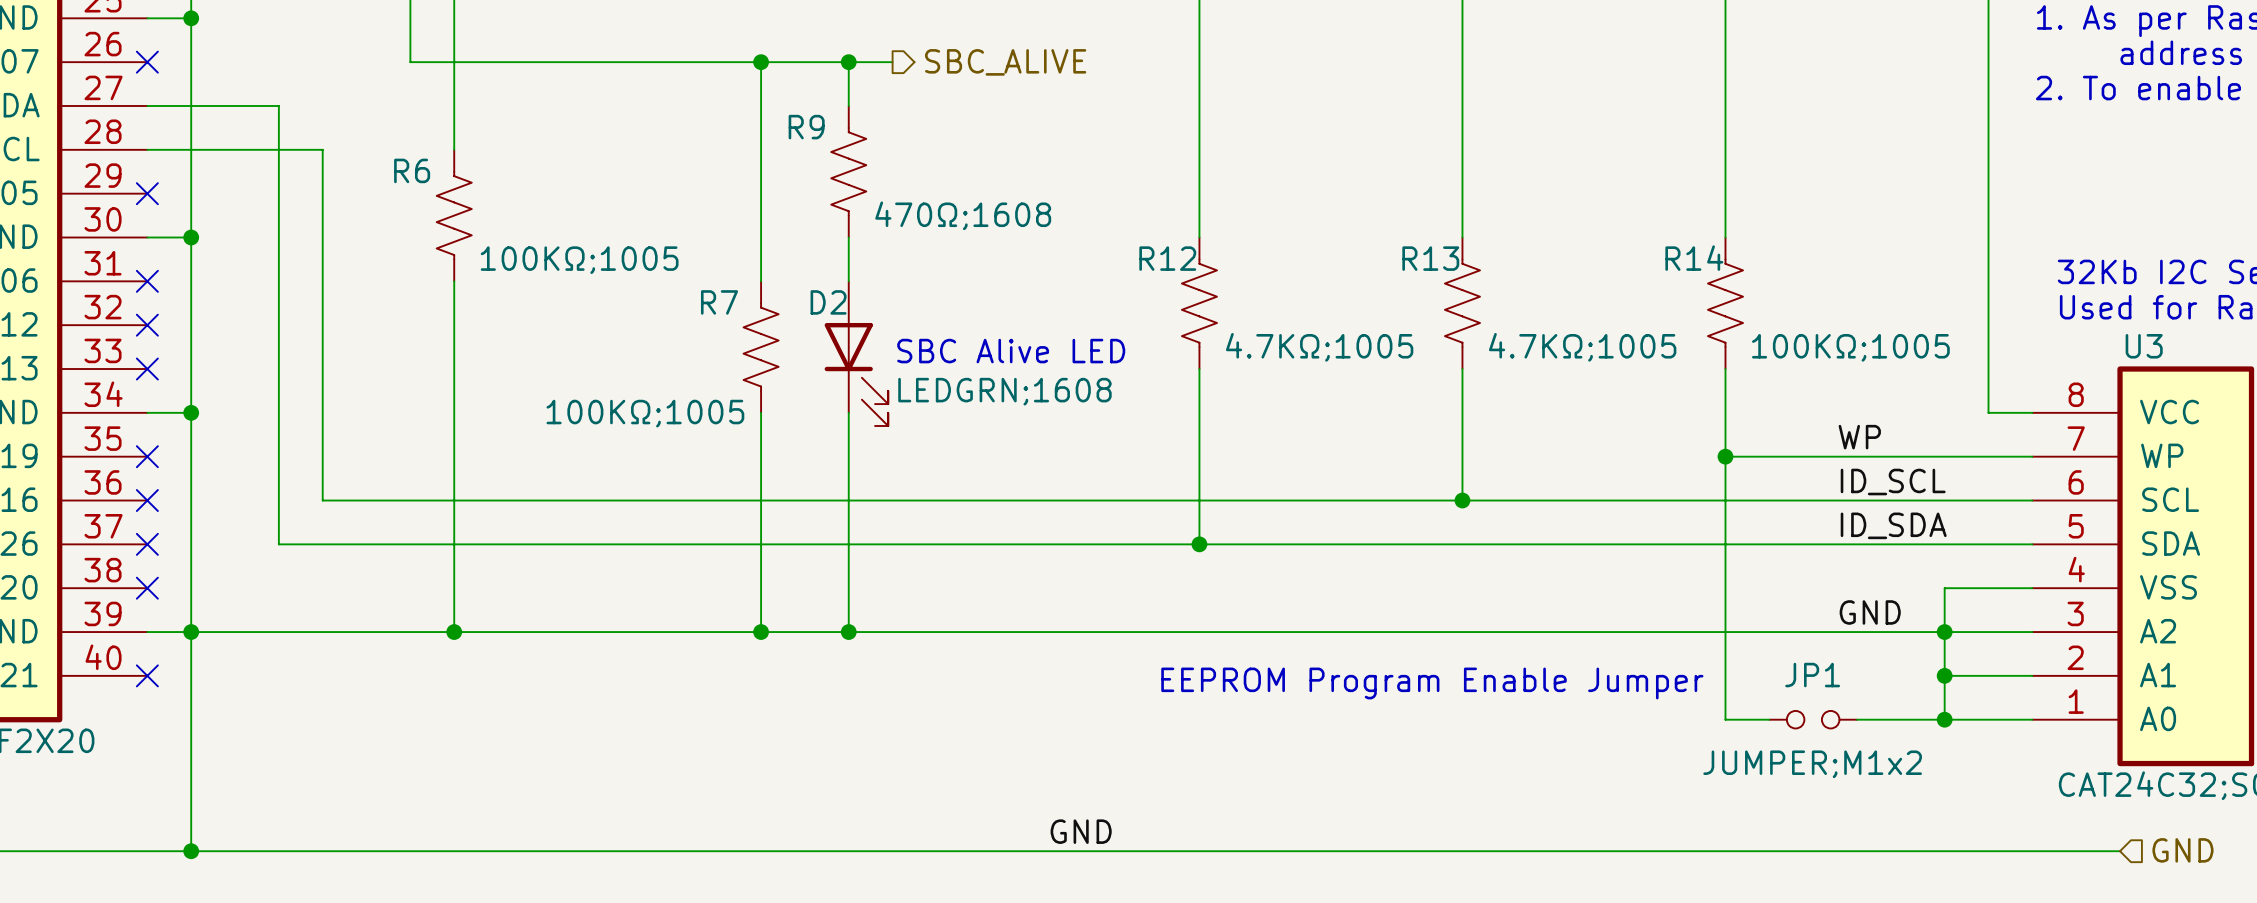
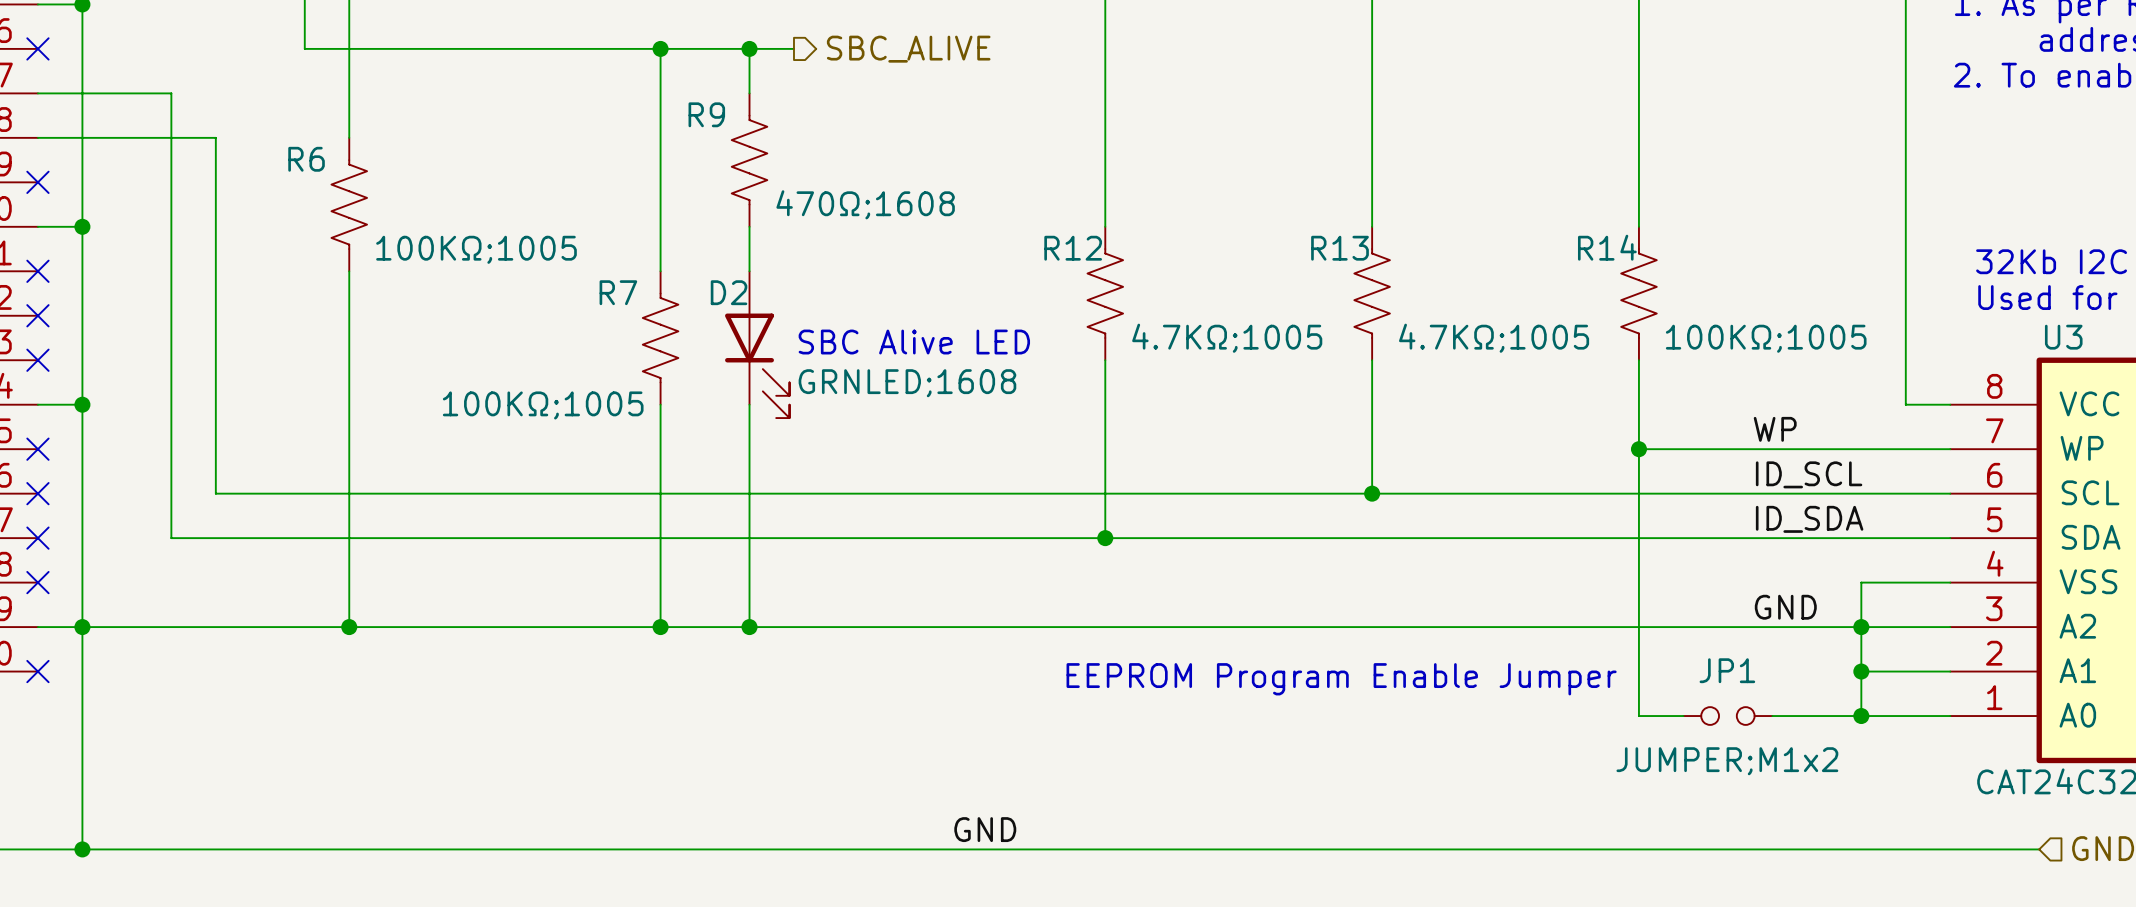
D2 value: LEDGRN;1608 (1004, 391) -> GRNLED;1608 (907, 383)

